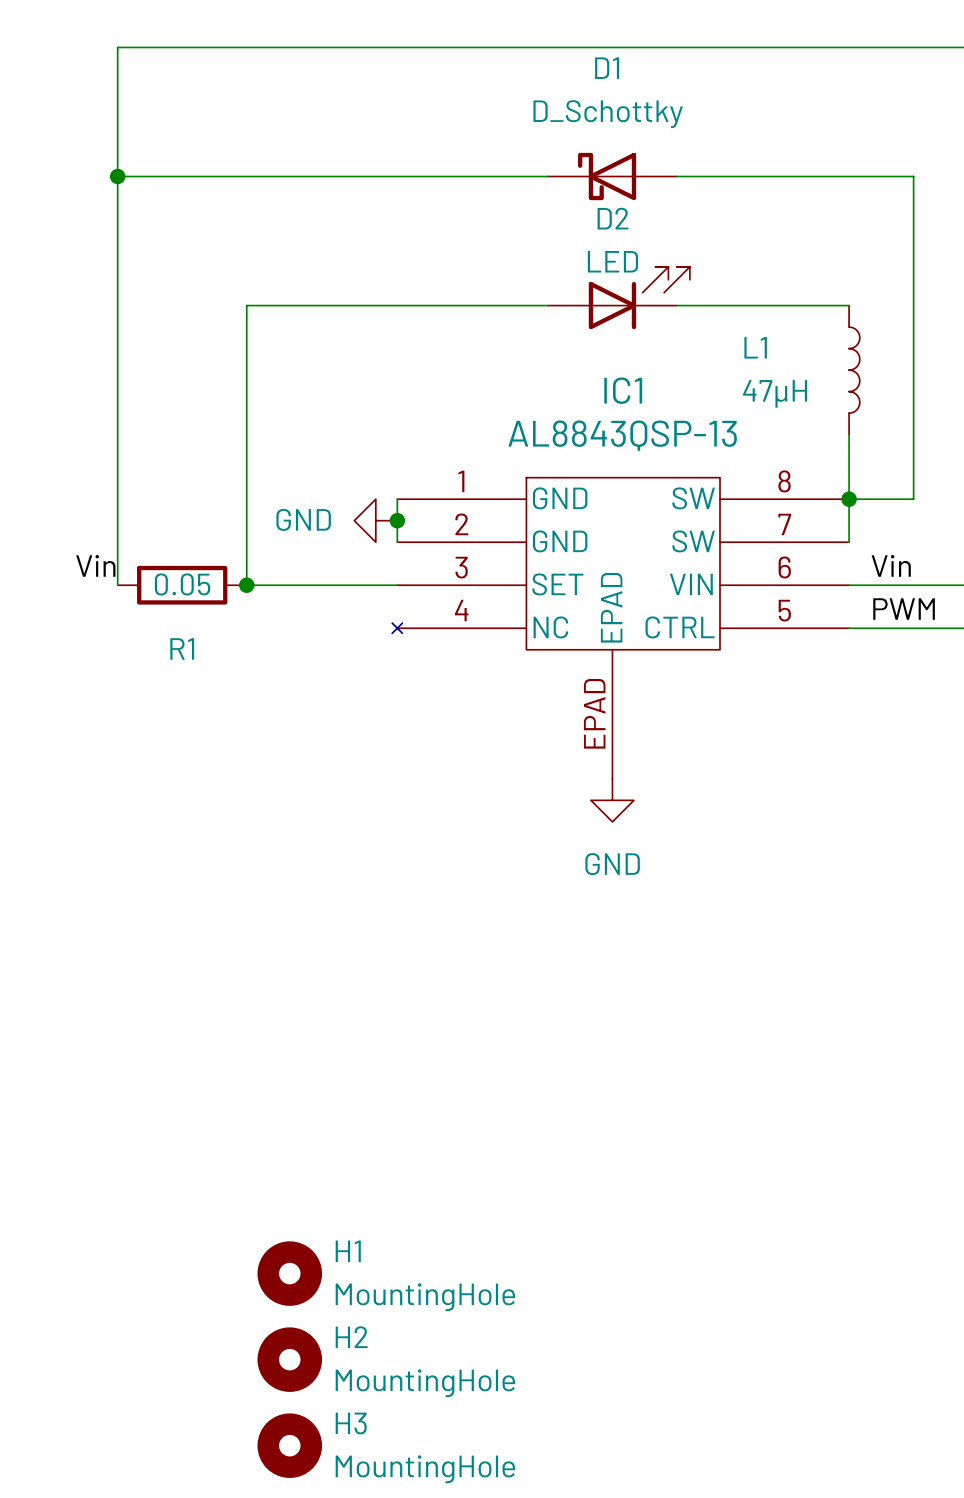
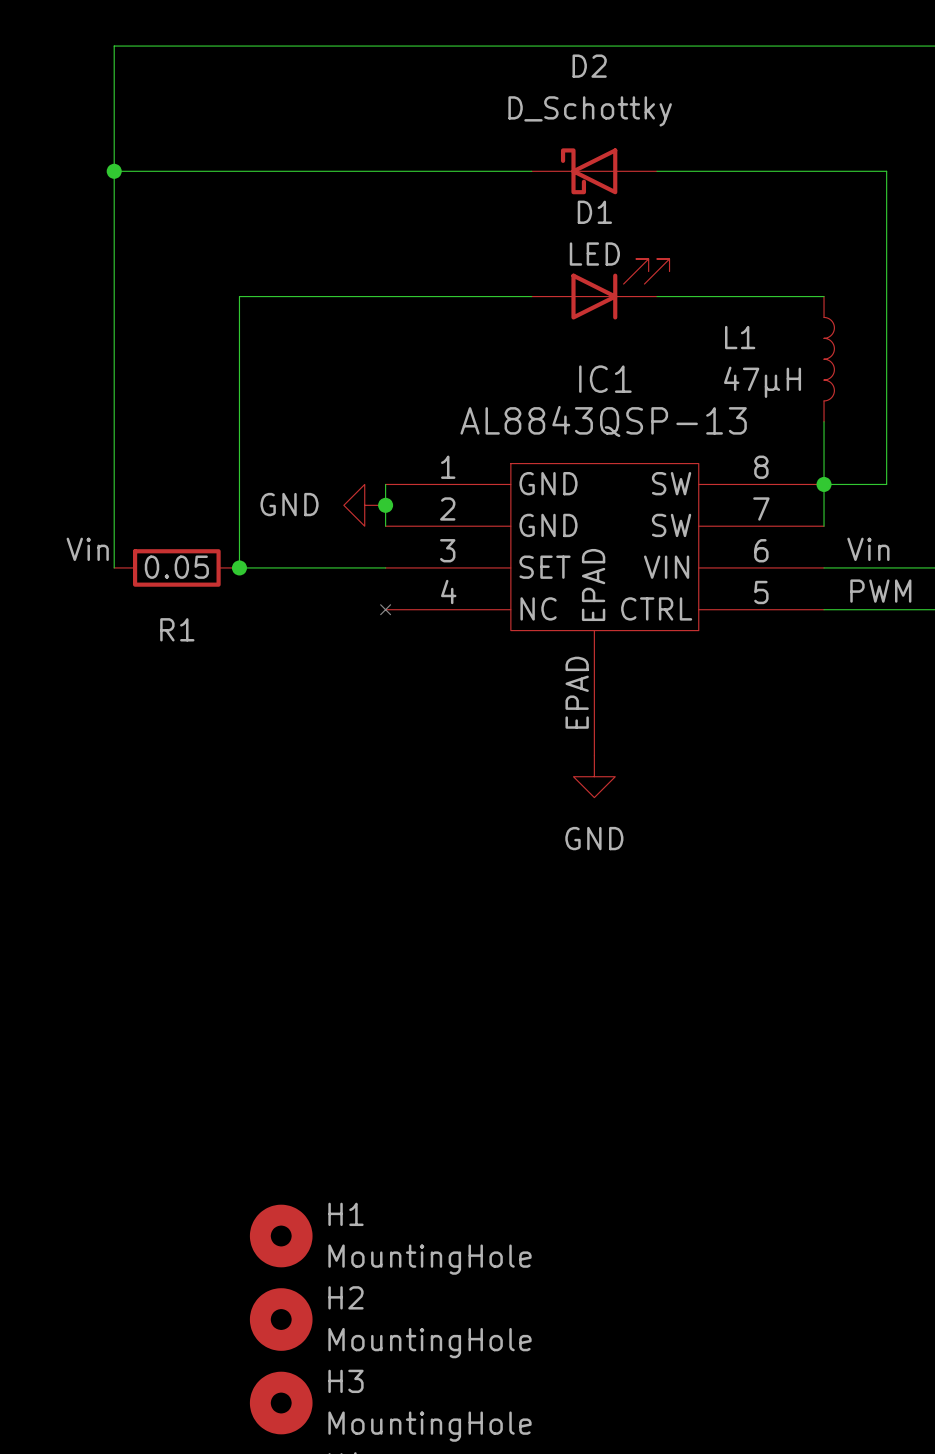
D1 name: D1 (607, 68) -> D2 (589, 66)
D2 name: D2 (613, 218) -> D1 (594, 212)

